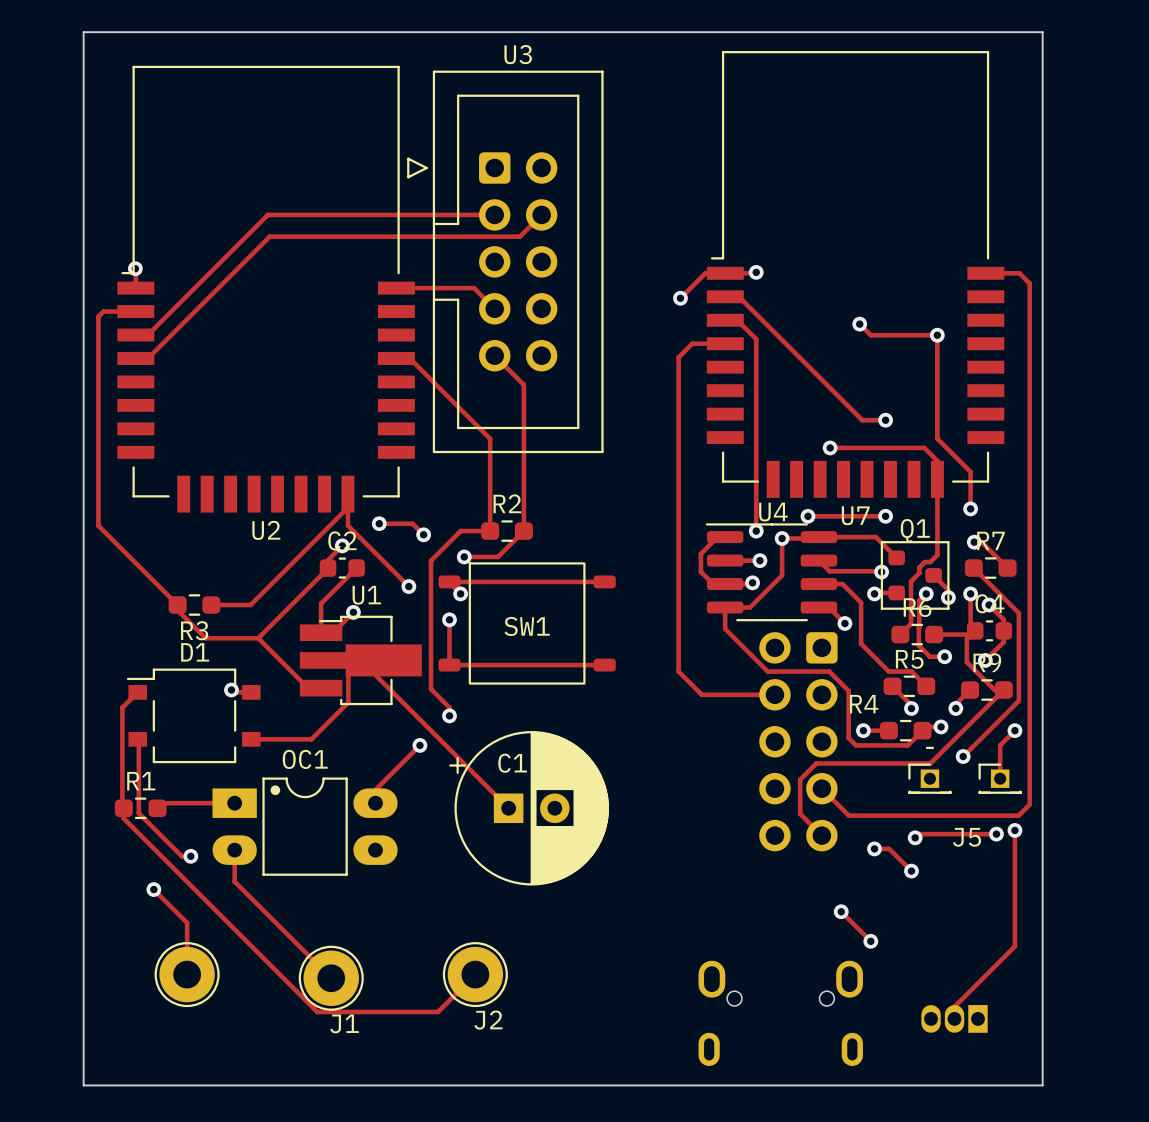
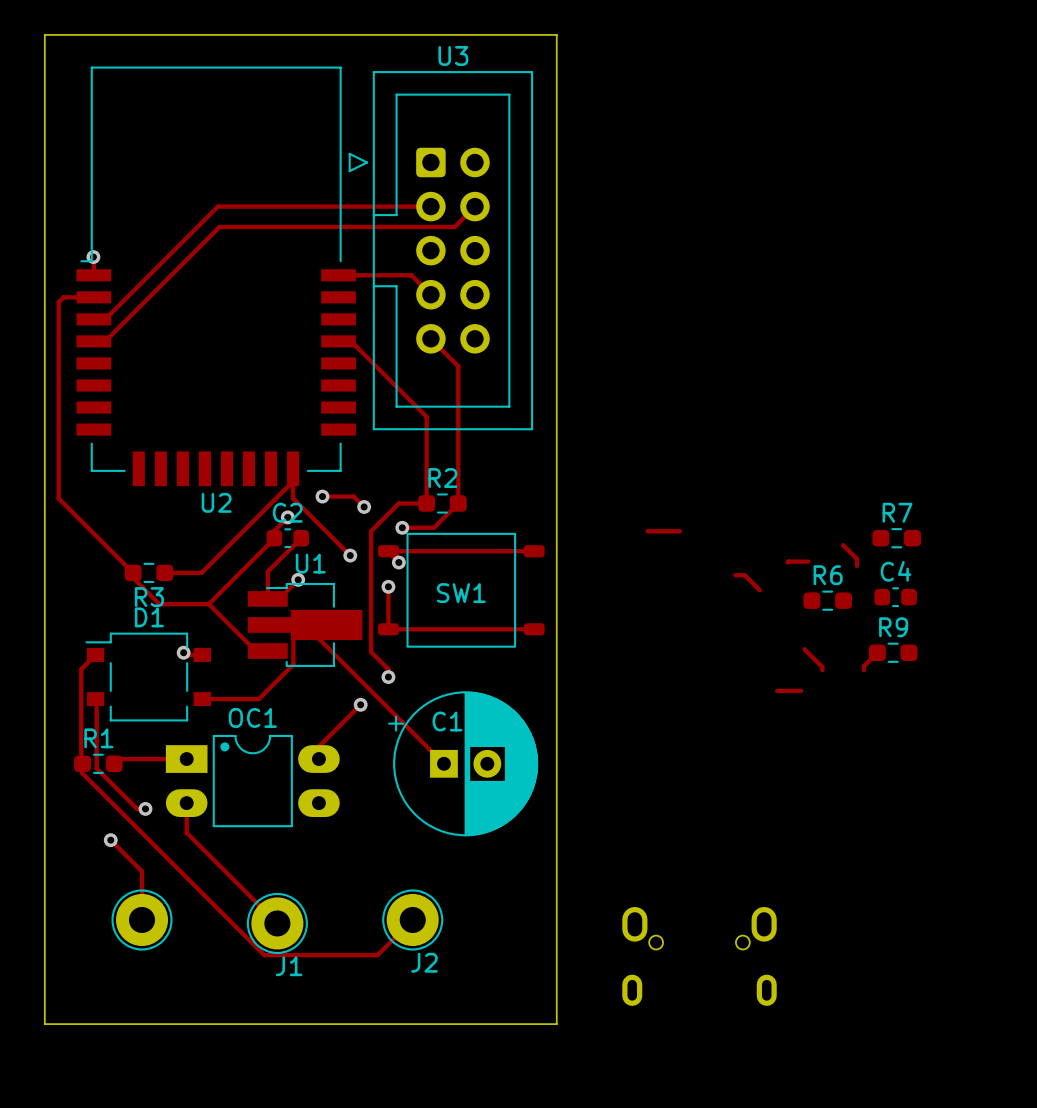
board edge: (628, 32) (1042, 32) (1042, 1085) (628, 1085) -> (556, 34) (556, 1024)
via: (756, 272) -> none
track: (755, 273) (705, 273) (680, 298) -> none
track: (985, 273) (1019, 273) (1029, 283) (1029, 804) (1018, 815) (848, 815) (821, 788) -> none
U7: (855, 274) -> none
track: (725, 296) (738, 296) (862, 420) (885, 420) -> none
via: (680, 298) -> none
track: (725, 320) (737, 320) (756, 339) (756, 531) -> none
track: (859, 324) (870, 335) (937, 335) (937, 438) (970, 471) (970, 508) -> none
via: (859, 324) -> none
via: (937, 335) -> none
track: (725, 343) (692, 343) (678, 357) (678, 671) (701, 694) (774, 694) -> none
via: (885, 420) -> none
track: (830, 447) (924, 447) (937, 460) (937, 555) (930, 562) (925, 562) (919, 567) (919, 573) (911, 581) (911, 623) (900, 634) -> none
via: (830, 447) -> none
via: (970, 508) -> none
track: (807, 516) (885, 516) -> none
via: (807, 516) -> none
via: (885, 516) -> none
via: (756, 531) -> none
track: (725, 537) (717, 537) (700, 553) (700, 571) (713, 584) (752, 582) -> none
via: (782, 538) -> none
track: (974, 542) (981, 542) (1007, 568) -> none
via: (974, 542) -> none
track: (896, 557) (875, 537) (782, 538) (782, 575) (750, 607) (725, 607) (725, 628) (767, 671) (829, 671) (848, 690) (848, 738) (856, 745) (907, 745) (926, 726) (941, 726) -> none
via: (759, 560) -> none
track: (818, 560) (829, 571) (881, 572) -> none
track: (973, 568) (1018, 613) (1018, 700) (963, 756) -> none
U4: (771, 572) -> none
via: (881, 572) -> none
Q1: (915, 575) -> none
via: (752, 582) -> none
track: (818, 584) (842, 584) (861, 602) (861, 643) (888, 671) (911, 671) (926, 686) -> none
via: (874, 593) -> none
track: (926, 593) (919, 600) (918, 645) (929, 656) (944, 656) -> none
via: (926, 593) -> none
track: (970, 593) (970, 626) (975, 630) (966, 639) (966, 662) (994, 690) (1003, 690) (930, 763) (816, 763) (800, 779) (800, 813) (821, 835) -> none
via: (970, 593) -> none
via: (948, 597) -> none
track: (989, 605) (1003, 619) (1003, 641) (985, 660) -> none
via: (989, 605) -> none
via: (844, 623) -> none
track: (934, 634) (971, 634) -> none
via: (944, 656) -> none
via: (985, 660) -> none
R5: (909, 686) -> none
via: (911, 708) -> none
via: (955, 708) -> none
via: (941, 726) -> none
via: (863, 730) -> none
R4: (905, 730) -> none
track: (1014, 730) (1000, 745) (1000, 778) -> none
via: (1014, 730) -> none
part: (798, 741) -> none
via: (963, 756) -> none
part: (929, 778) -> none
J5: (1000, 778) -> none
track: (1014, 830) (1014, 946) (954, 1006) (954, 1018) -> none
via: (1014, 830) -> none
track: (996, 834) (918, 834) (915, 837) -> none
via: (996, 834) -> none
via: (915, 837) -> none
track: (874, 848) (889, 848) (911, 871) -> none
via: (874, 848) -> none
via: (911, 871) -> none
track: (841, 911) (870, 941) -> none
via: (841, 911) -> none
via: (870, 941) -> none
part: (954, 1018) -> none

